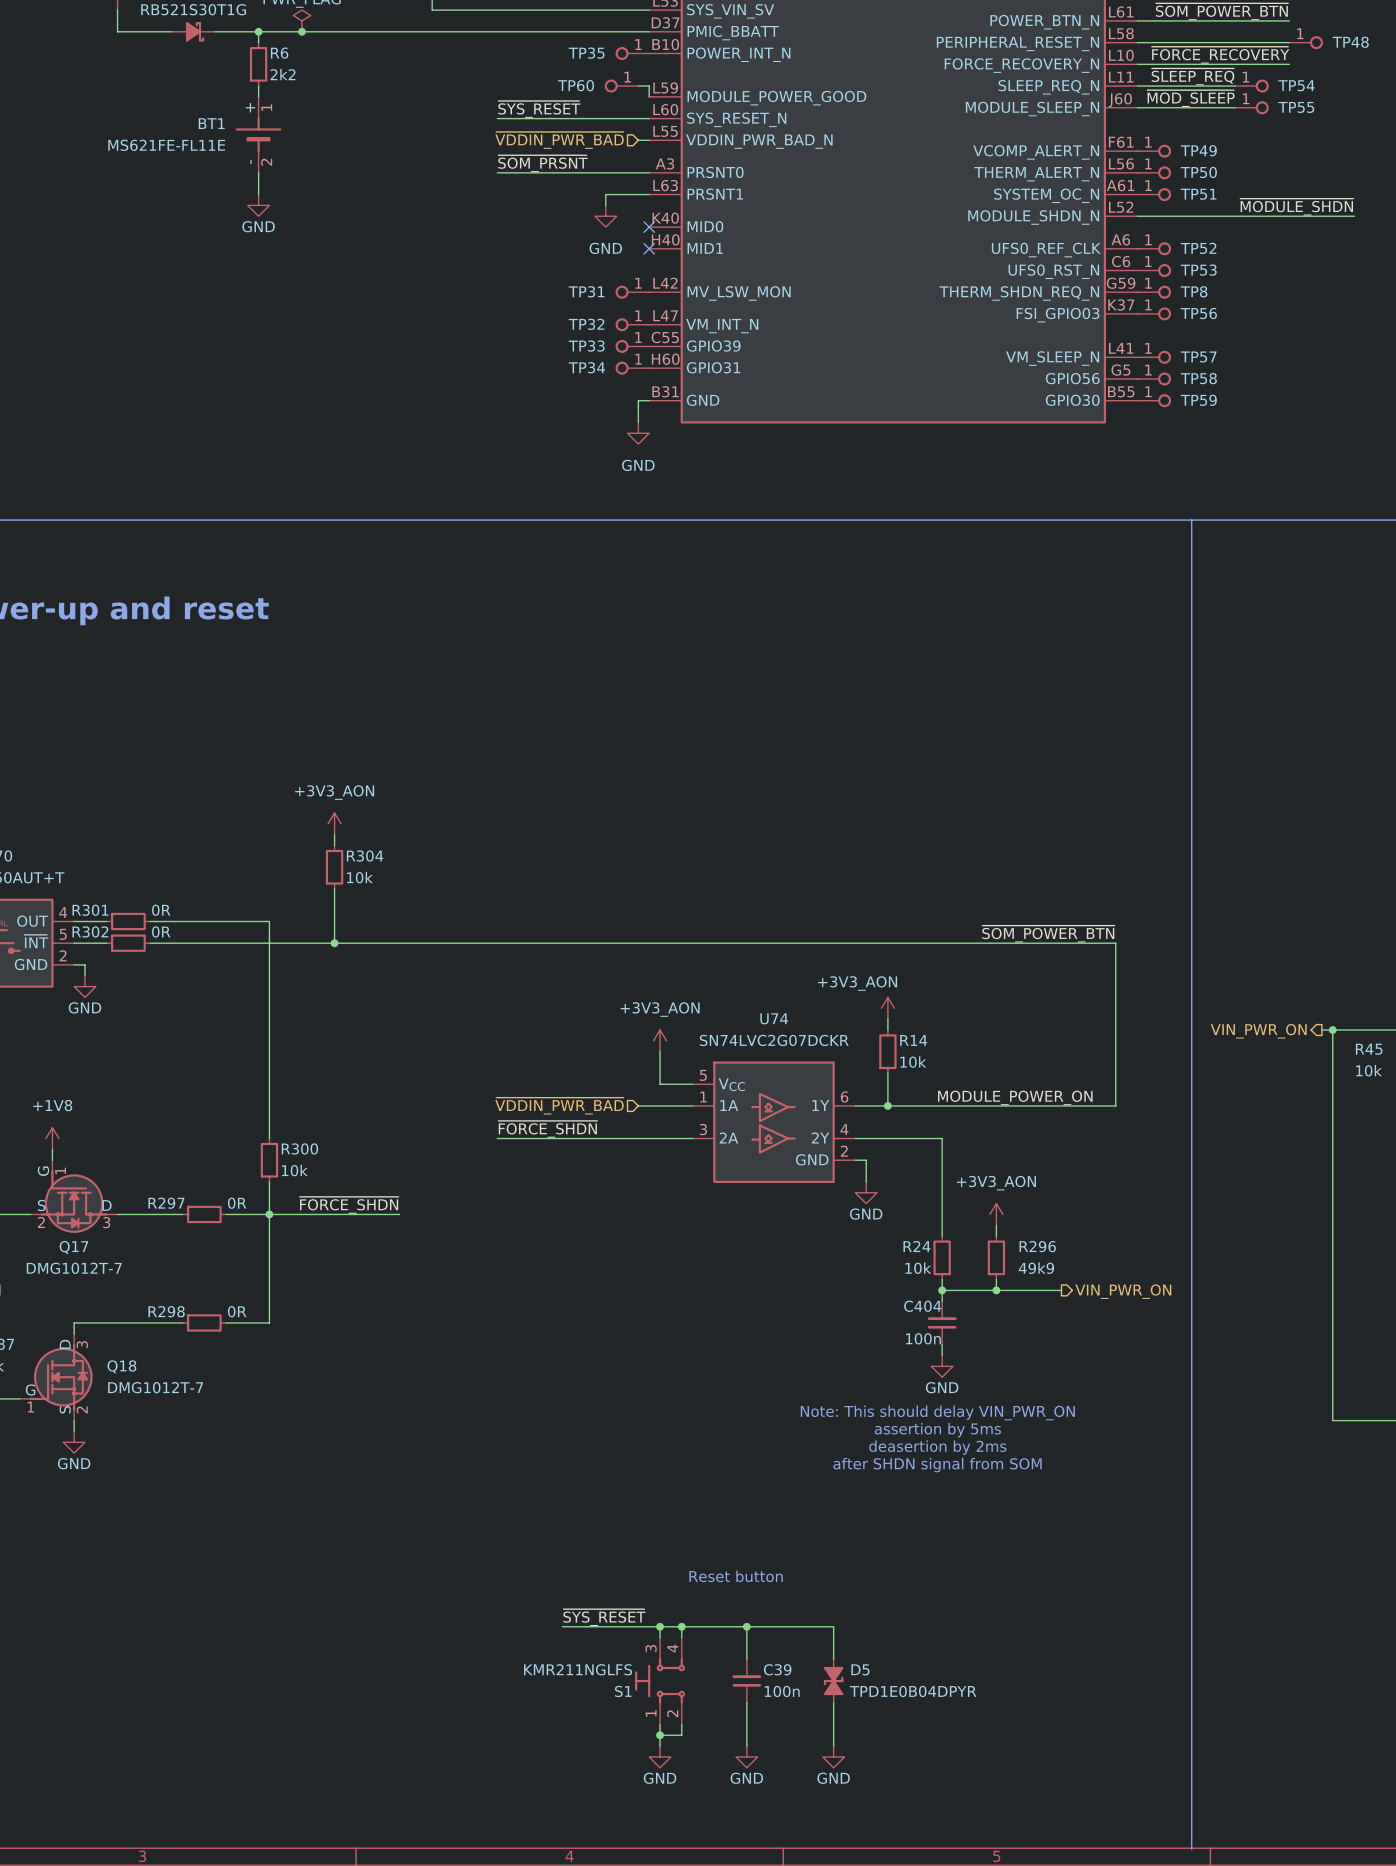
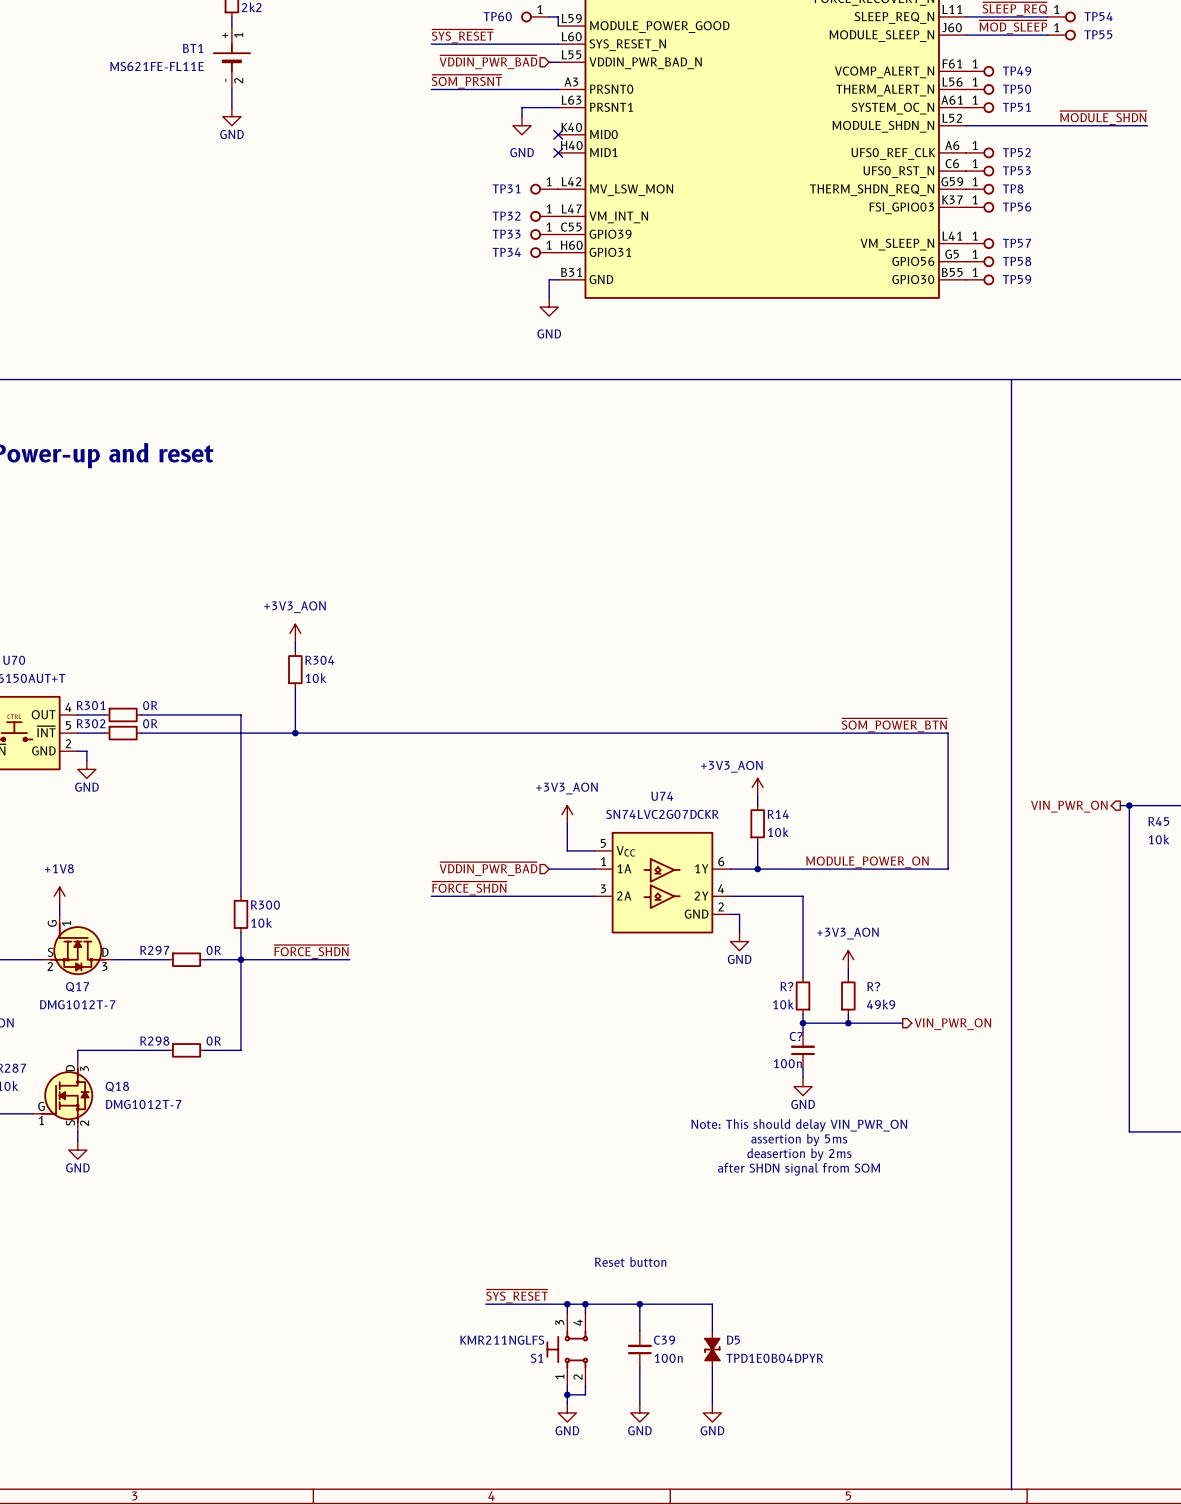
R24 name: R24 (916, 1246) -> R? (786, 986)
R296 name: R296 (1037, 1246) -> R? (873, 986)
C404 name: C404 (922, 1306) -> C? (796, 1036)

